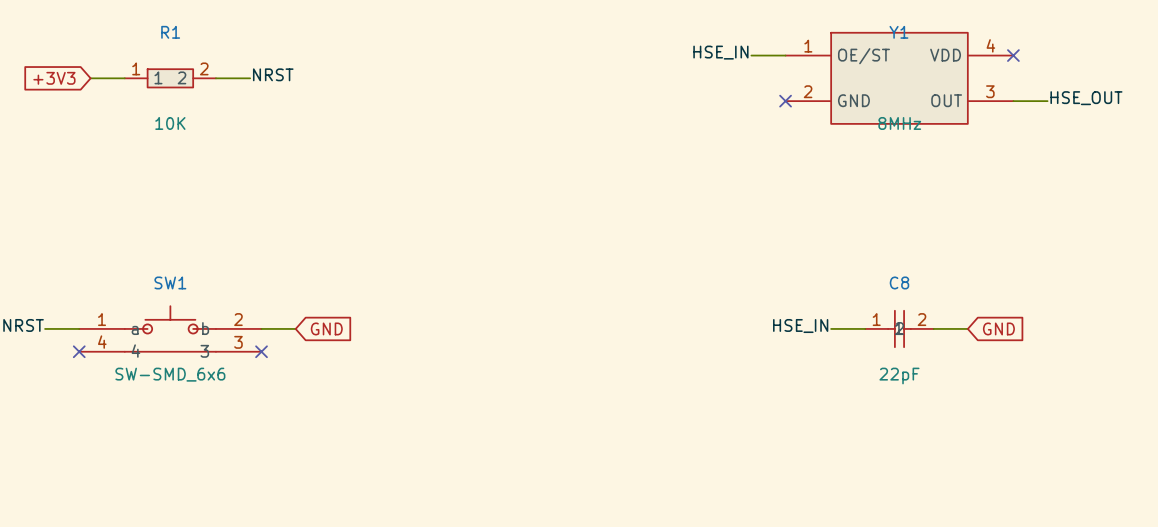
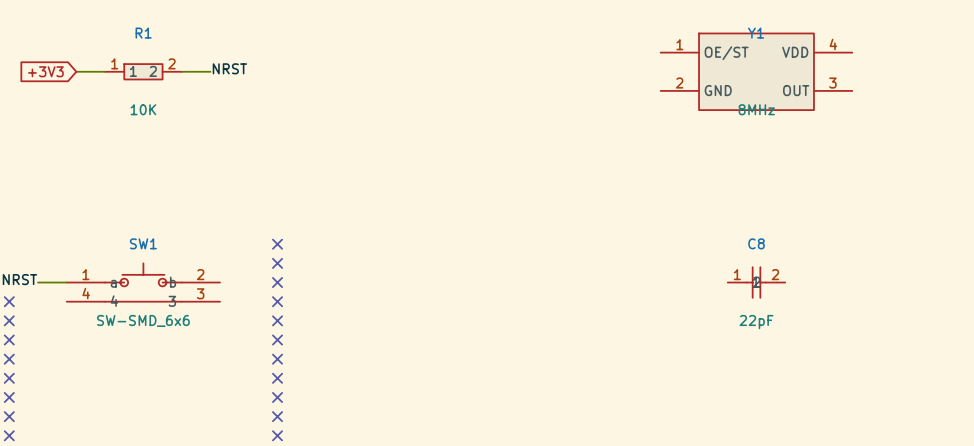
label: HSE_IN (720, 52) -> none
wire: (751, 55) (785, 55) -> none
no-connect mark: (1013, 55) -> none
label: HSE_OUT (1086, 98) -> none
no-connect mark: (785, 101) -> none
wire: (1013, 101) (1047, 101) -> none
no-connect mark: none -> (277, 244)
no-connect mark: none -> (277, 263)
label: HSE_IN (800, 326) -> none
wire: (261, 328) (295, 328) -> none
global label: GND (326, 328) -> none
no-connect mark: none -> (277, 282)
wire: (831, 328) (865, 328) -> none
wire: (933, 328) (967, 328) -> none
global label: GND (998, 328) -> none
no-connect mark: none -> (9, 301)
no-connect mark: (79, 351) -> none
no-connect mark: (261, 351) -> none
no-connect mark: none -> (277, 301)
no-connect mark: none -> (9, 320)
no-connect mark: none -> (277, 320)
no-connect mark: none -> (9, 340)
no-connect mark: none -> (277, 340)
no-connect mark: none -> (9, 359)
no-connect mark: none -> (277, 359)
no-connect mark: none -> (9, 378)
no-connect mark: none -> (277, 378)
no-connect mark: none -> (9, 397)
no-connect mark: none -> (277, 397)
no-connect mark: none -> (9, 416)
no-connect mark: none -> (277, 416)
no-connect mark: none -> (9, 435)
no-connect mark: none -> (277, 435)

